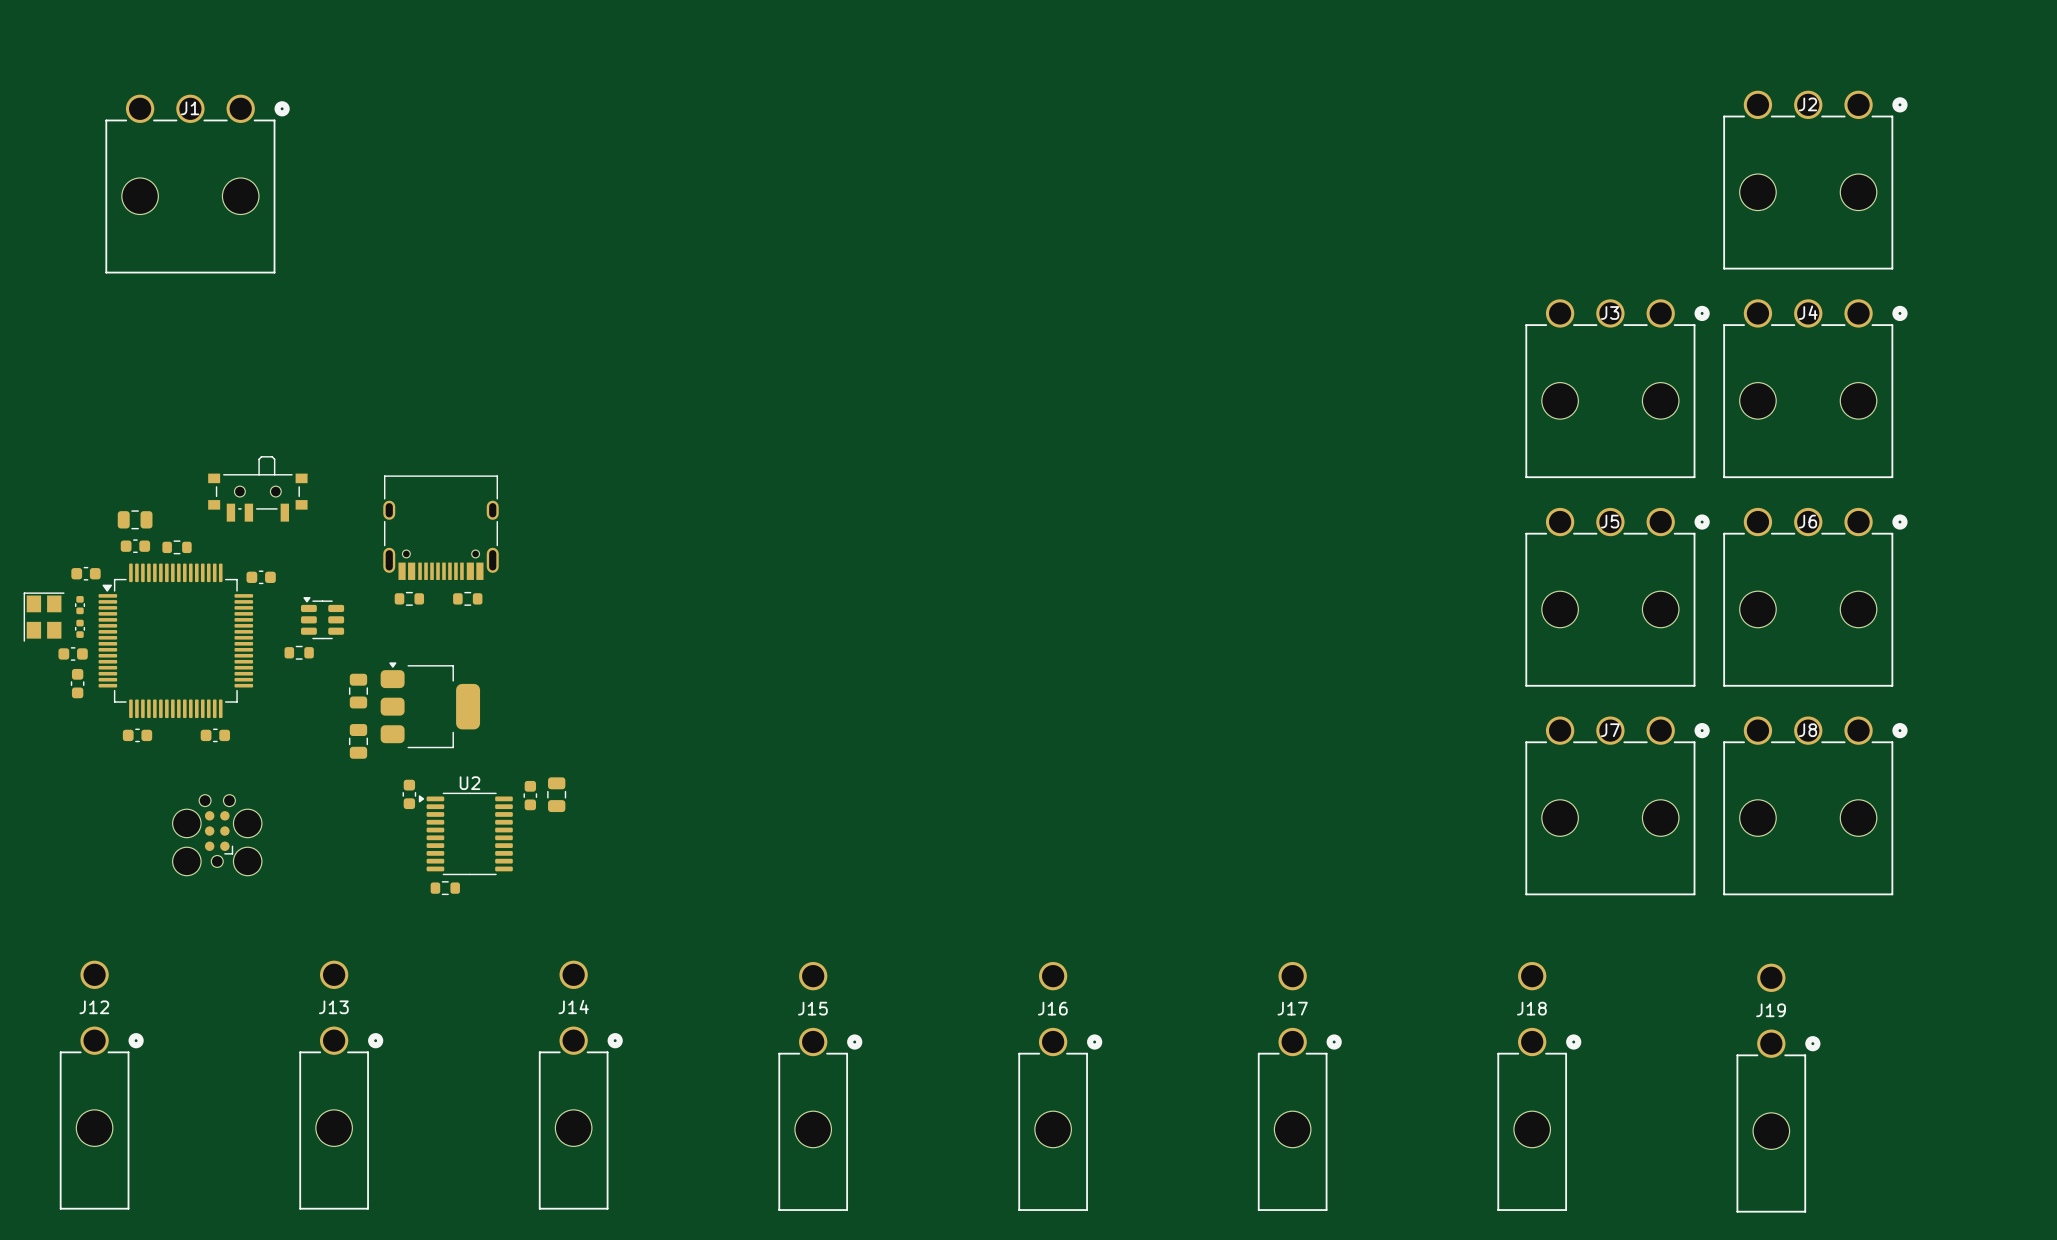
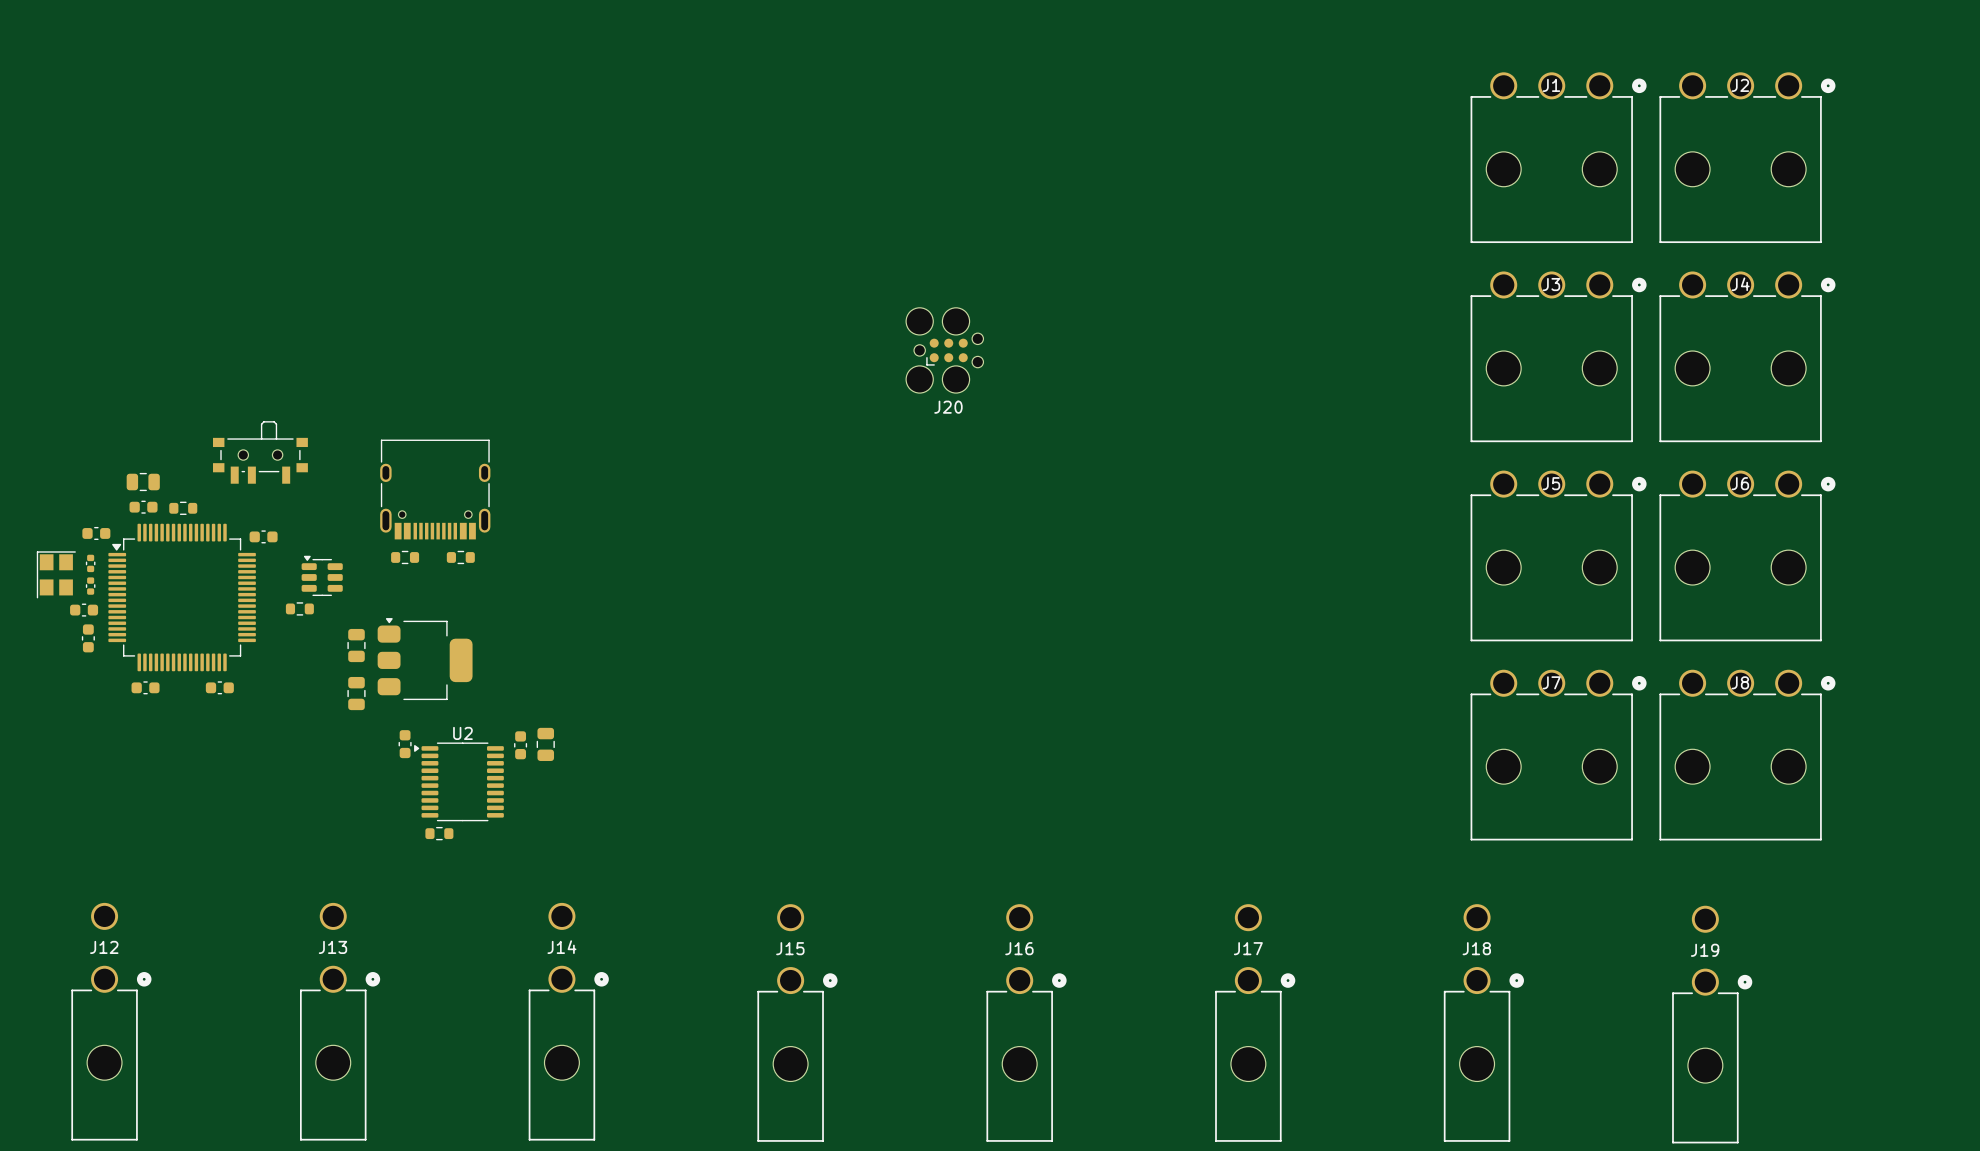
J1 position: (197, 184) -> (1558, 157)
J20: none -> (944, 350)
part: (217, 835) -> none

